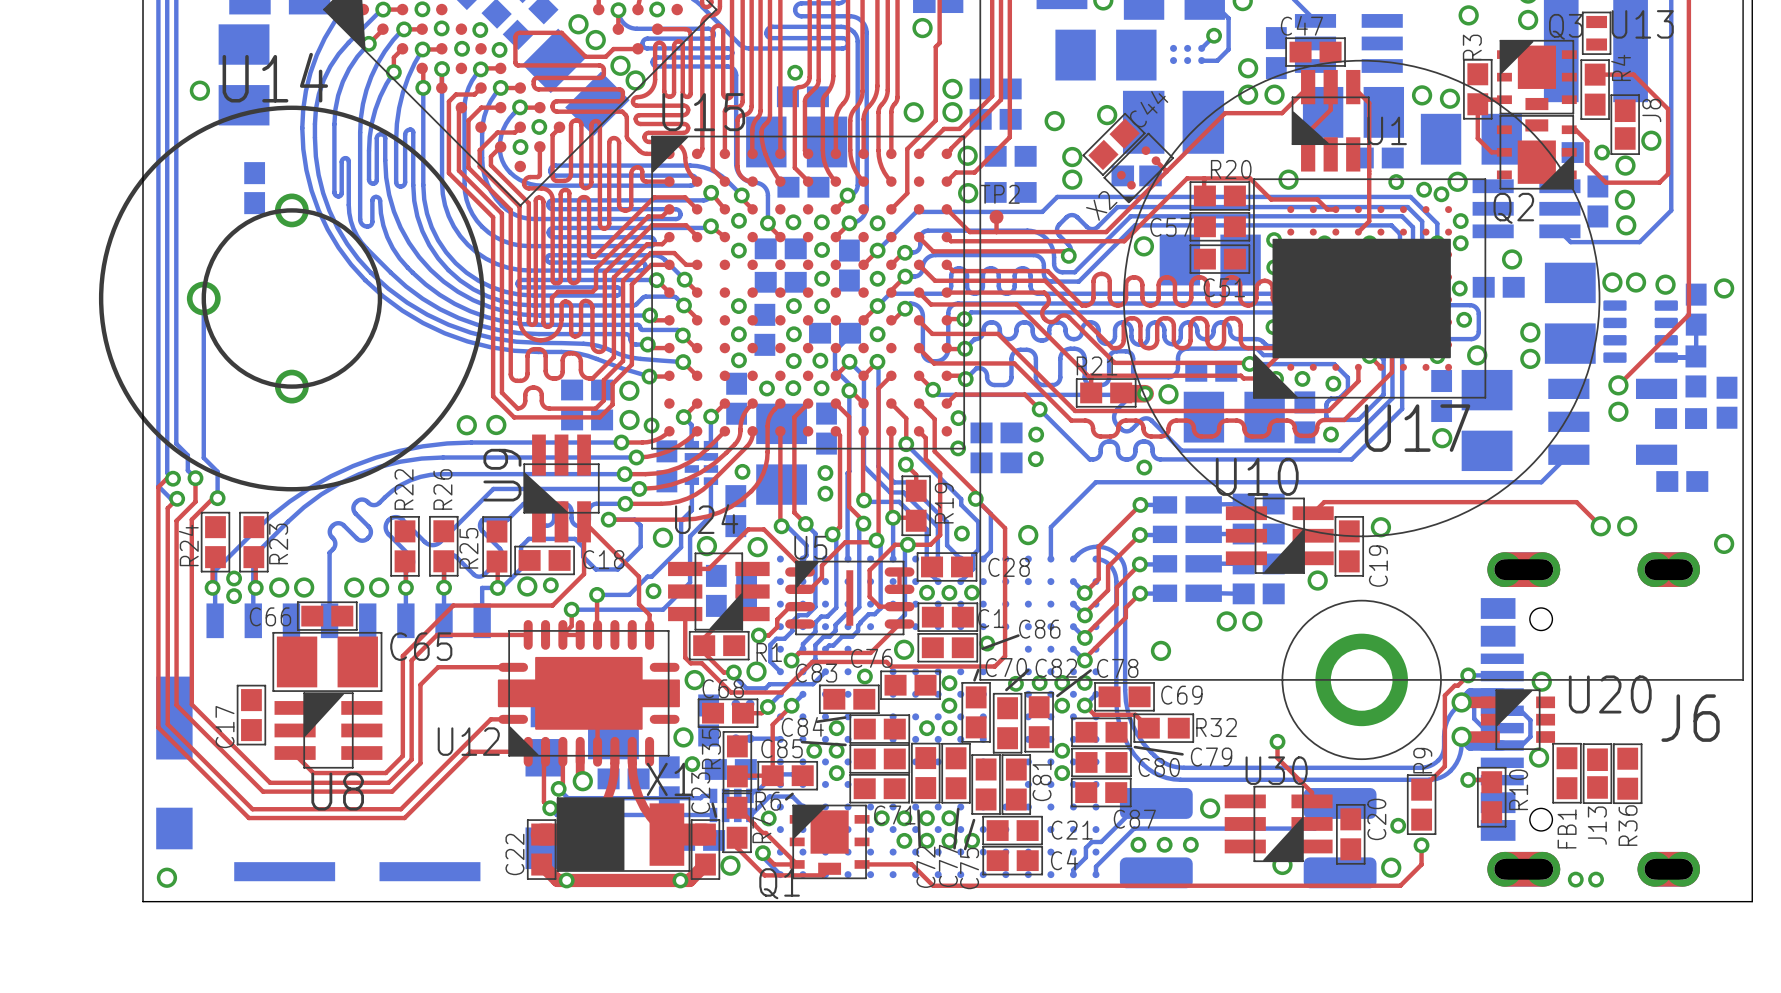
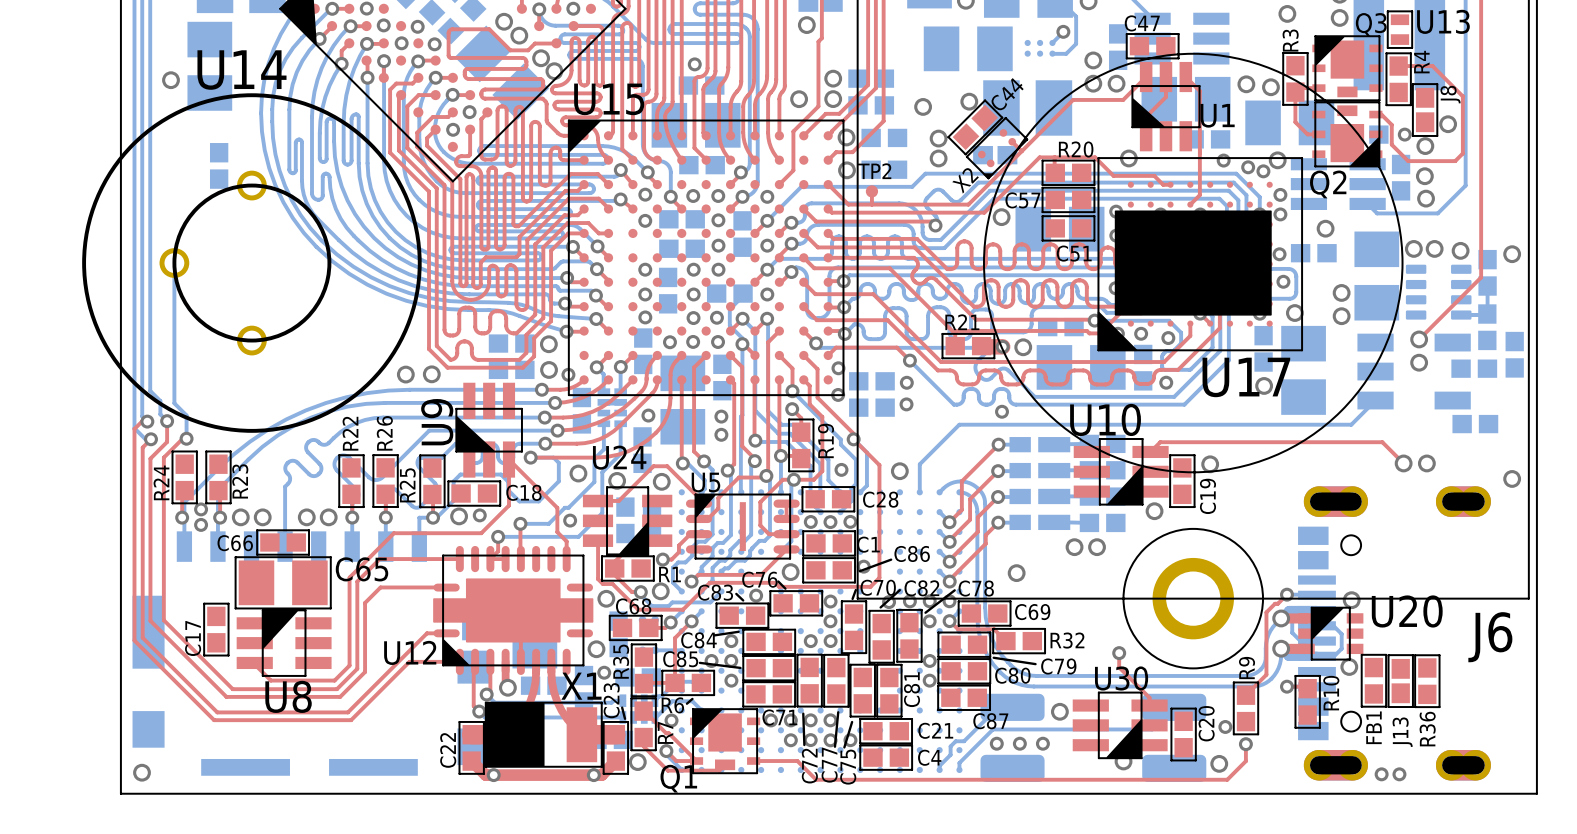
line: none -> (778, 581) (785, 588)
line: none -> (736, 593) (743, 600)
line: (802, 742) (845, 744) -> none
line: none -> (699, 662) (740, 667)

